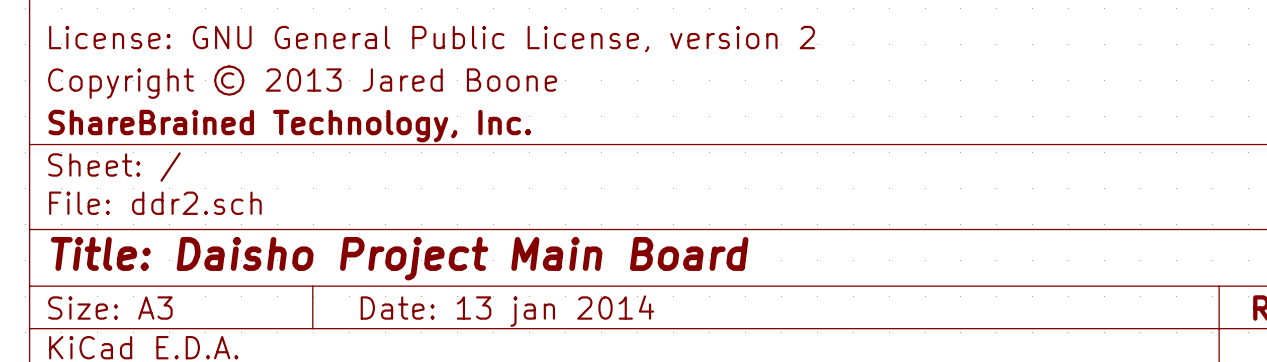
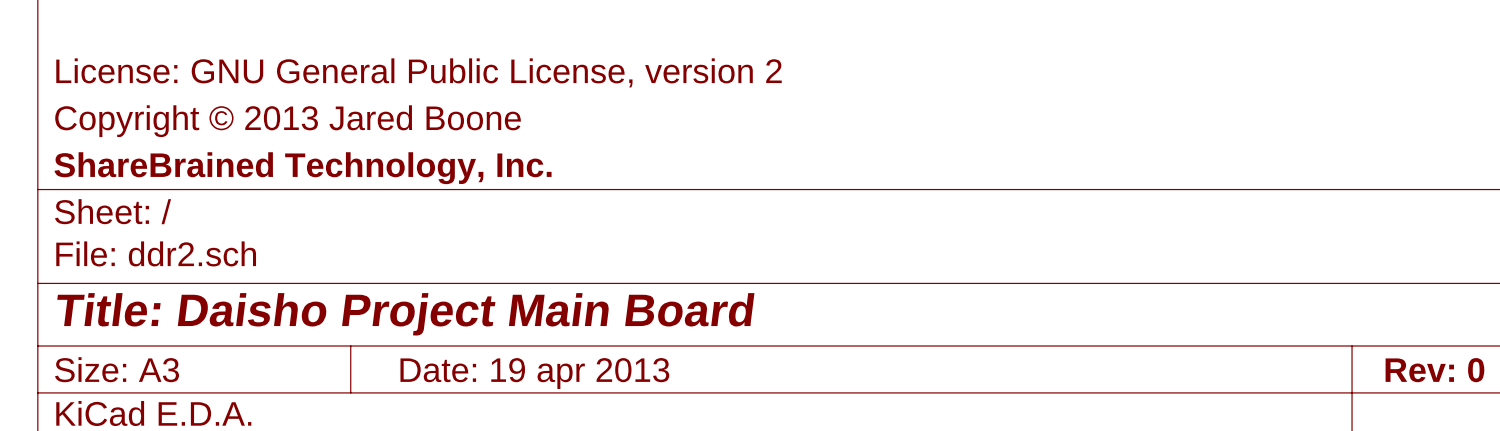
title block: Date: 13 jan 2014 (507, 311) -> Date: 19 apr 2013 (534, 373)

